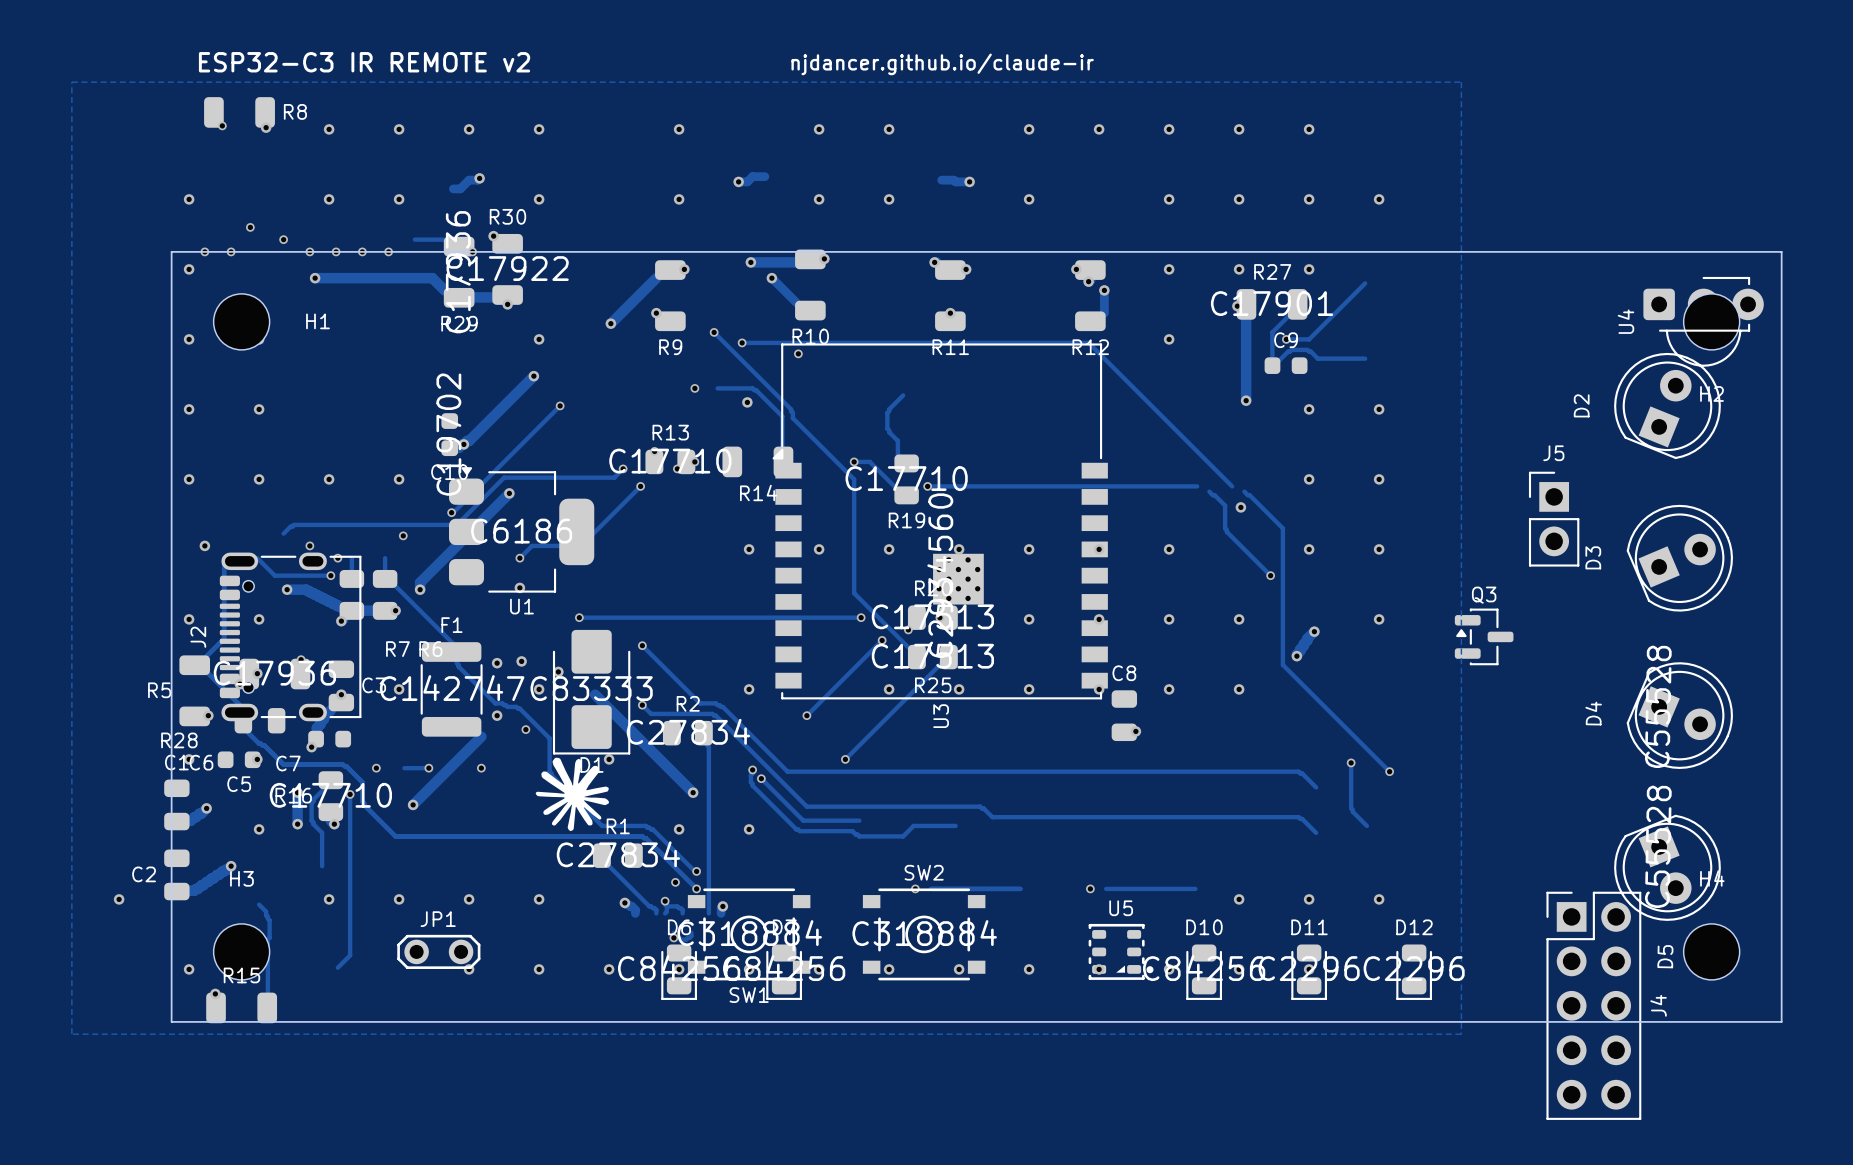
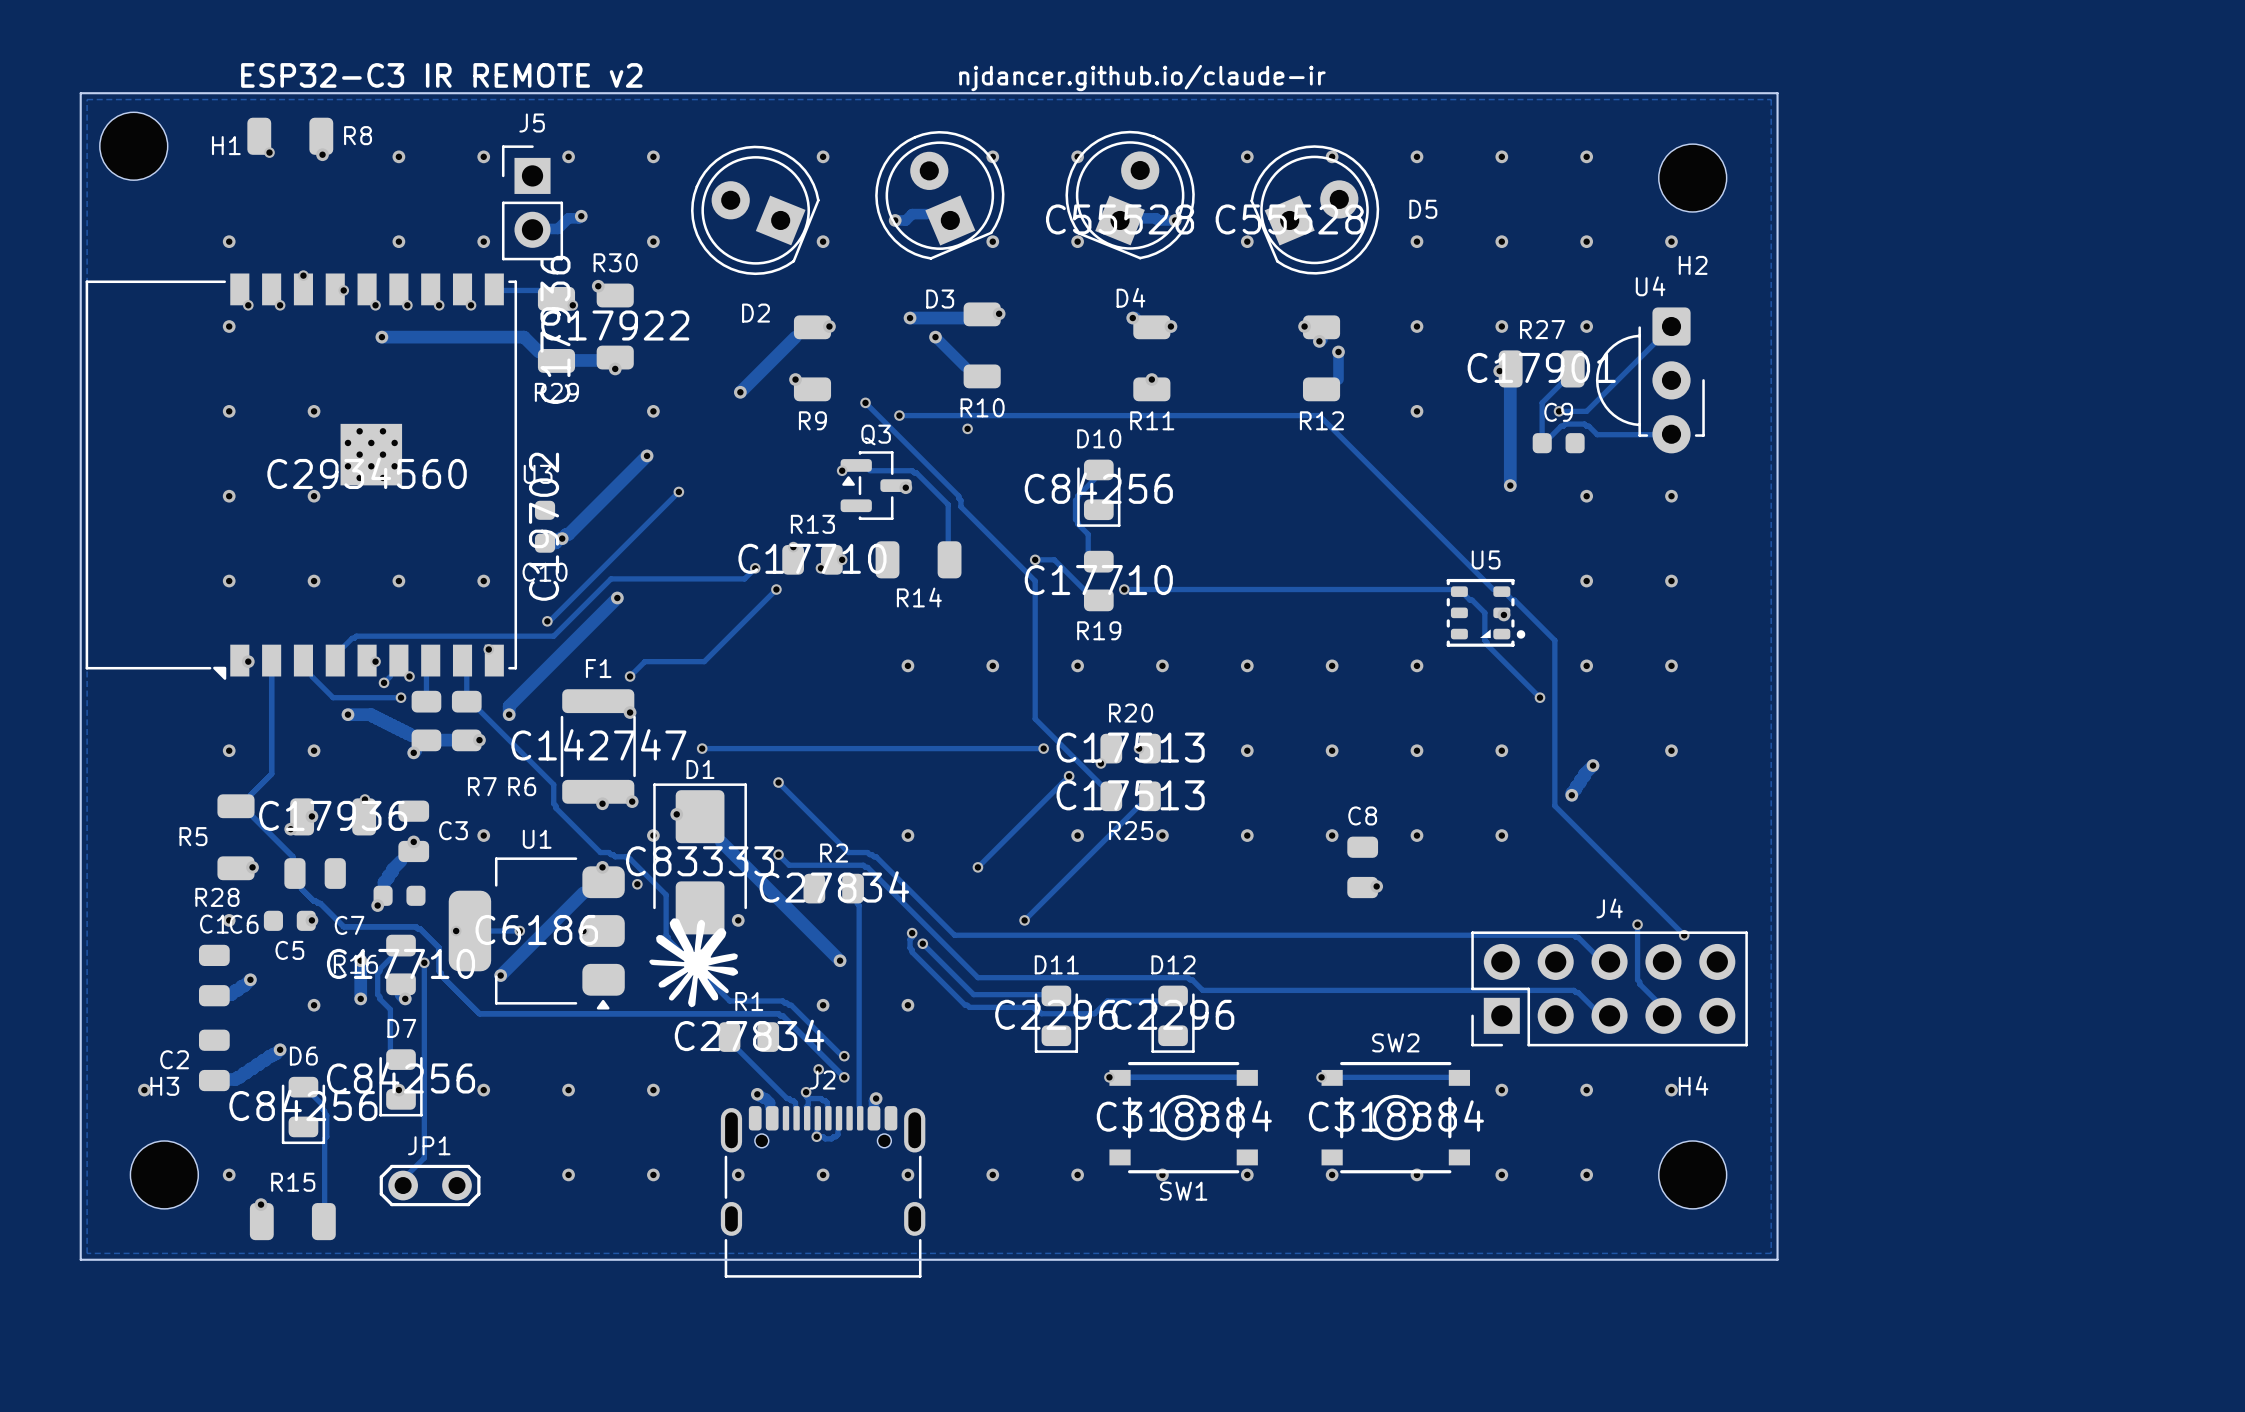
board edge: (171, 251) (1781, 251) (1781, 1021) (171, 1021) (171, 251) -> (80, 93) (80, 1259) (1777, 1259) (1777, 93) (80, 93)
H1 position: (241, 321) -> (133, 146)
U4 rotation: 0° (1703, 321) -> 90° clockwise (1650, 380)
U4 position: (1703, 321) -> (1650, 380)
H2 position: (1711, 321) -> (1692, 178)
D2 rotation: 0° (1667, 405) -> 90° counterclockwise (755, 210)
D2 position: (1667, 405) -> (755, 210)
J5 position: (1554, 519) -> (532, 202)
U3 rotation: 0° (940, 521) -> 90° counterclockwise (301, 476)
U3 position: (940, 521) -> (301, 476)
U1 rotation: 0° (521, 529) -> 180° (536, 933)
U1 position: (521, 529) -> (536, 933)
D3 rotation: 0° (1679, 558) -> 90° counterclockwise (939, 195)
D3 position: (1679, 558) -> (939, 195)
J2 rotation: 0° (290, 636) -> 90° clockwise (823, 1191)
J2 position: (290, 636) -> (823, 1191)
Q3 position: (1484, 636) -> (876, 485)
F1 position: (451, 689) -> (598, 746)
D1 rotation: 0° (591, 692) -> 180° (700, 858)
D4 rotation: 0° (1679, 715) -> 91° counterclockwise (1130, 195)
D4 position: (1679, 715) -> (1130, 195)
D5 rotation: 0° (1667, 867) -> 91° counterclockwise (1314, 209)
D5 position: (1667, 867) -> (1314, 209)
SW1 position: (749, 934) -> (1183, 1117)
SW2 position: (924, 934) -> (1395, 1117)
H3 position: (241, 951) -> (164, 1174)
JP1 position: (438, 951) -> (430, 1185)
U5 position: (1121, 951) -> (1485, 612)
H4 position: (1711, 951) -> (1692, 1174)
D6 position: (679, 972) -> (303, 1110)
D7 position: (784, 972) -> (401, 1082)
D10 position: (1204, 972) -> (1098, 493)
D11 position: (1309, 972) -> (1056, 1019)
D12 position: (1414, 972) -> (1173, 1019)
J4 rotation: 0° (1593, 1005) -> 90° counterclockwise (1609, 988)
J4 position: (1593, 1005) -> (1609, 988)

